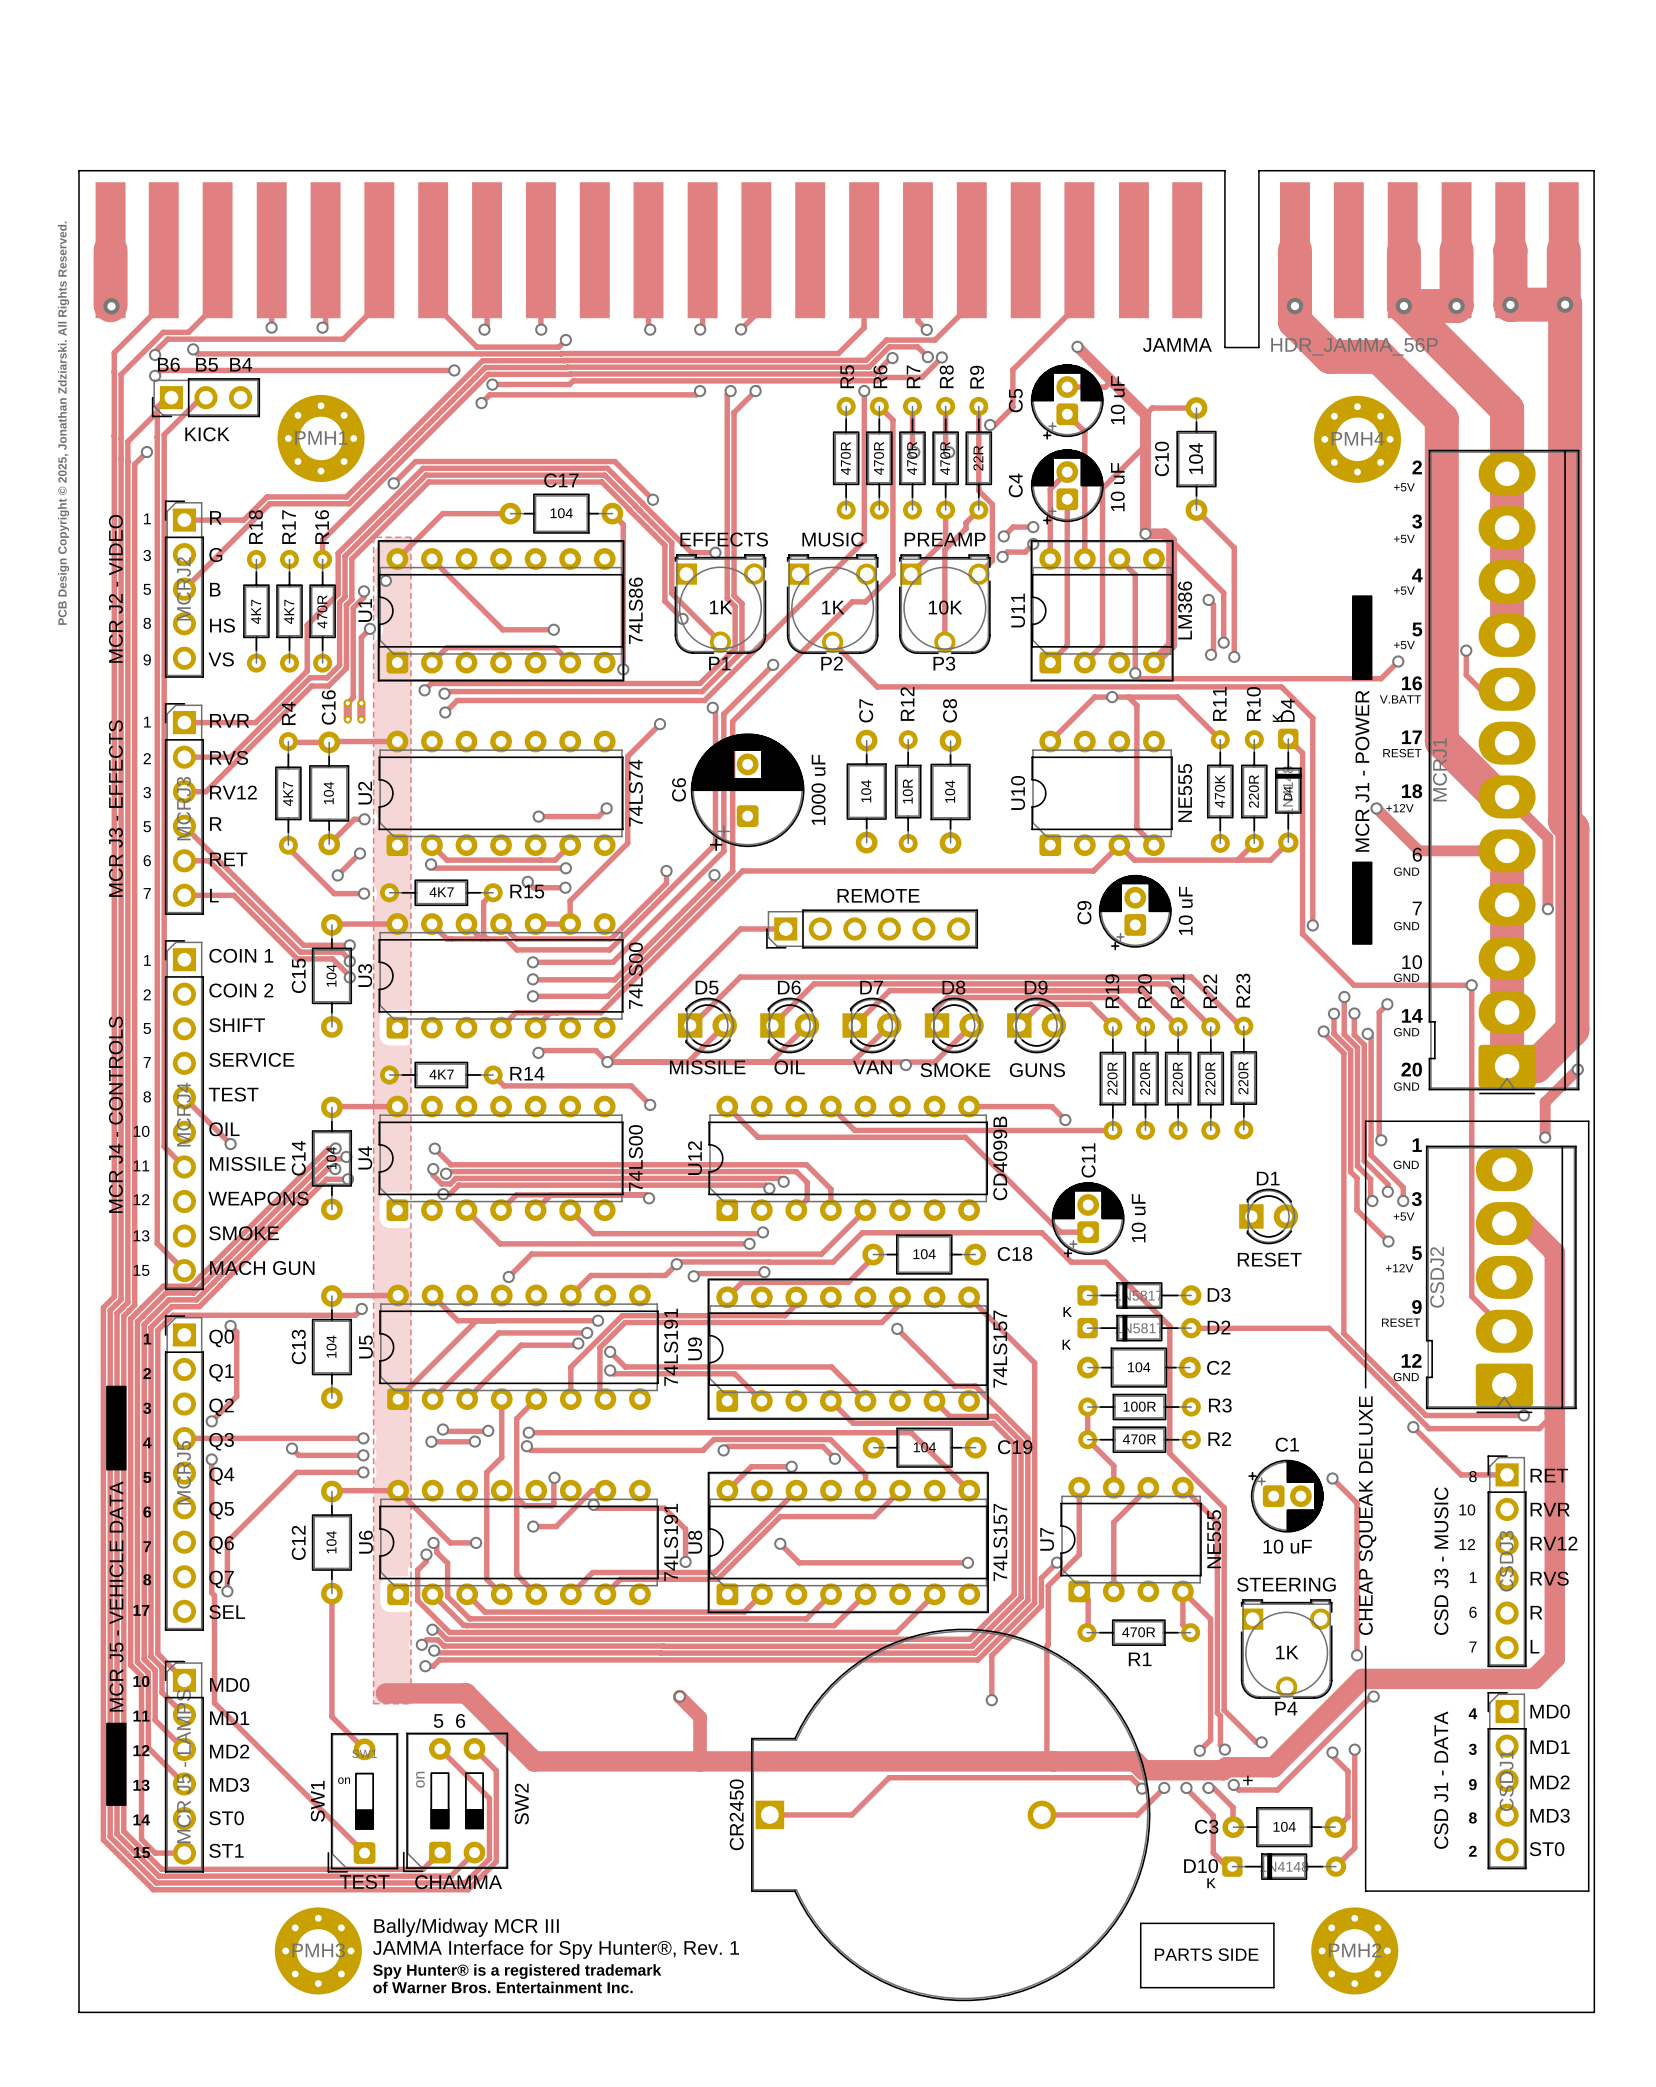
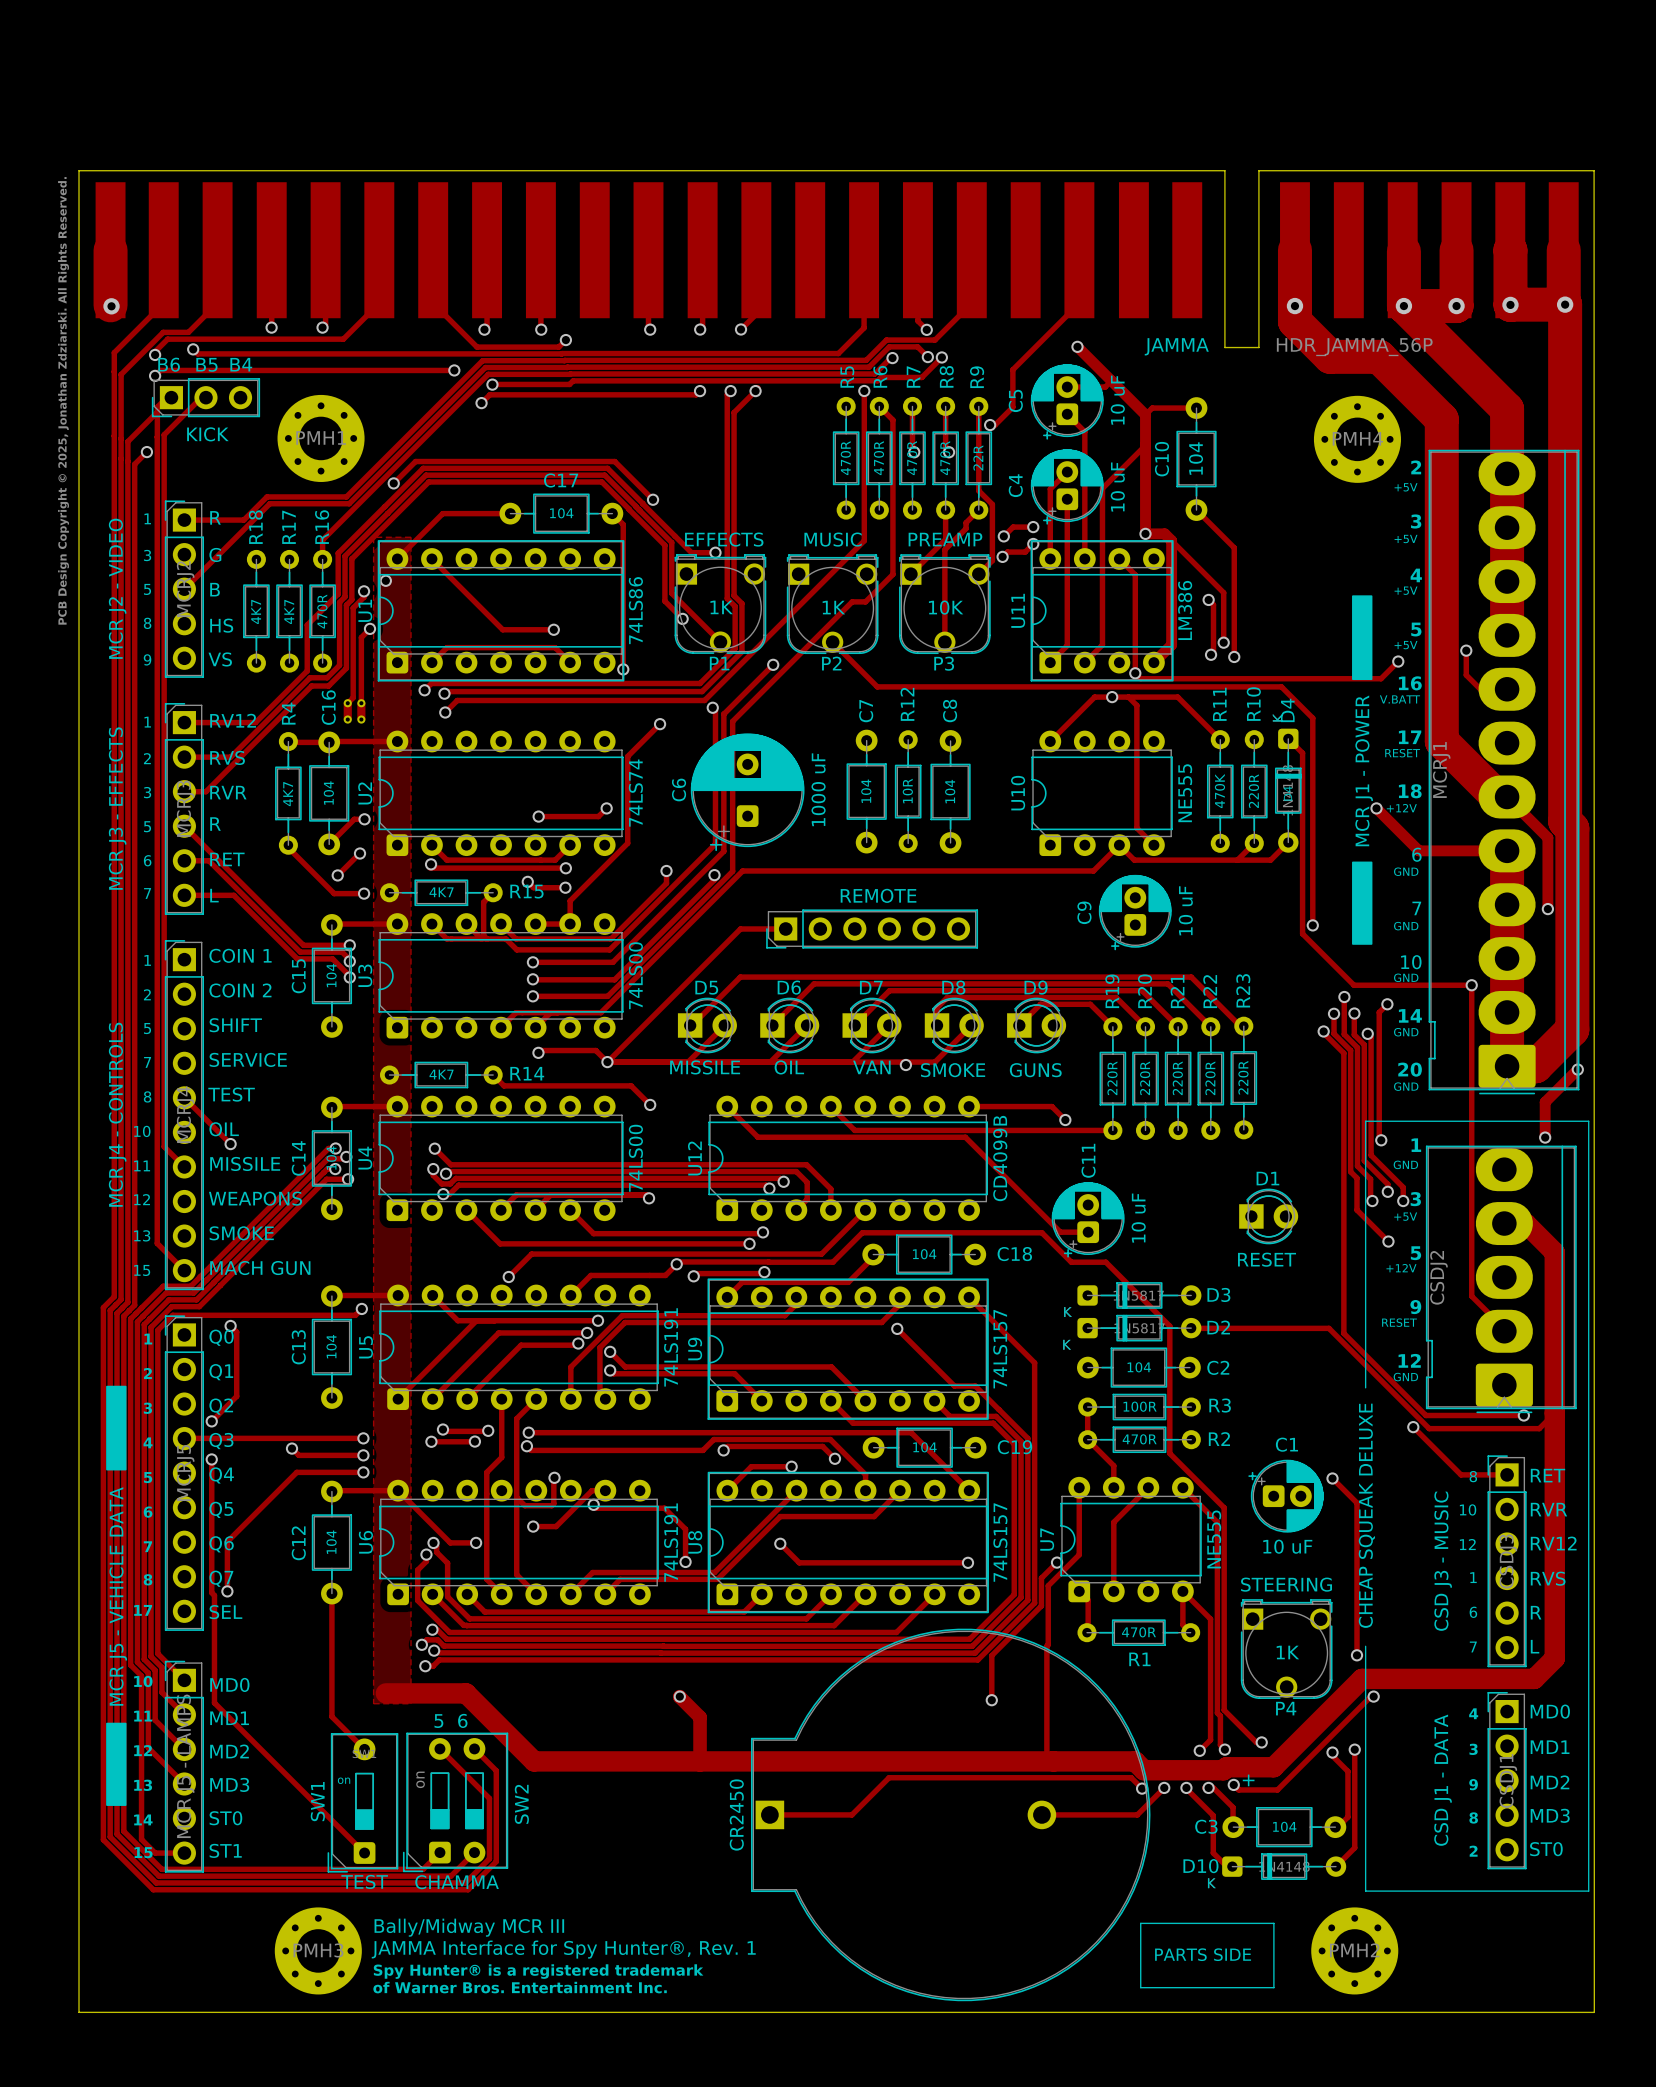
text: RVR (229, 720) -> RV12 (233, 720)
text: RV12 (233, 792) -> RVR (228, 792)

